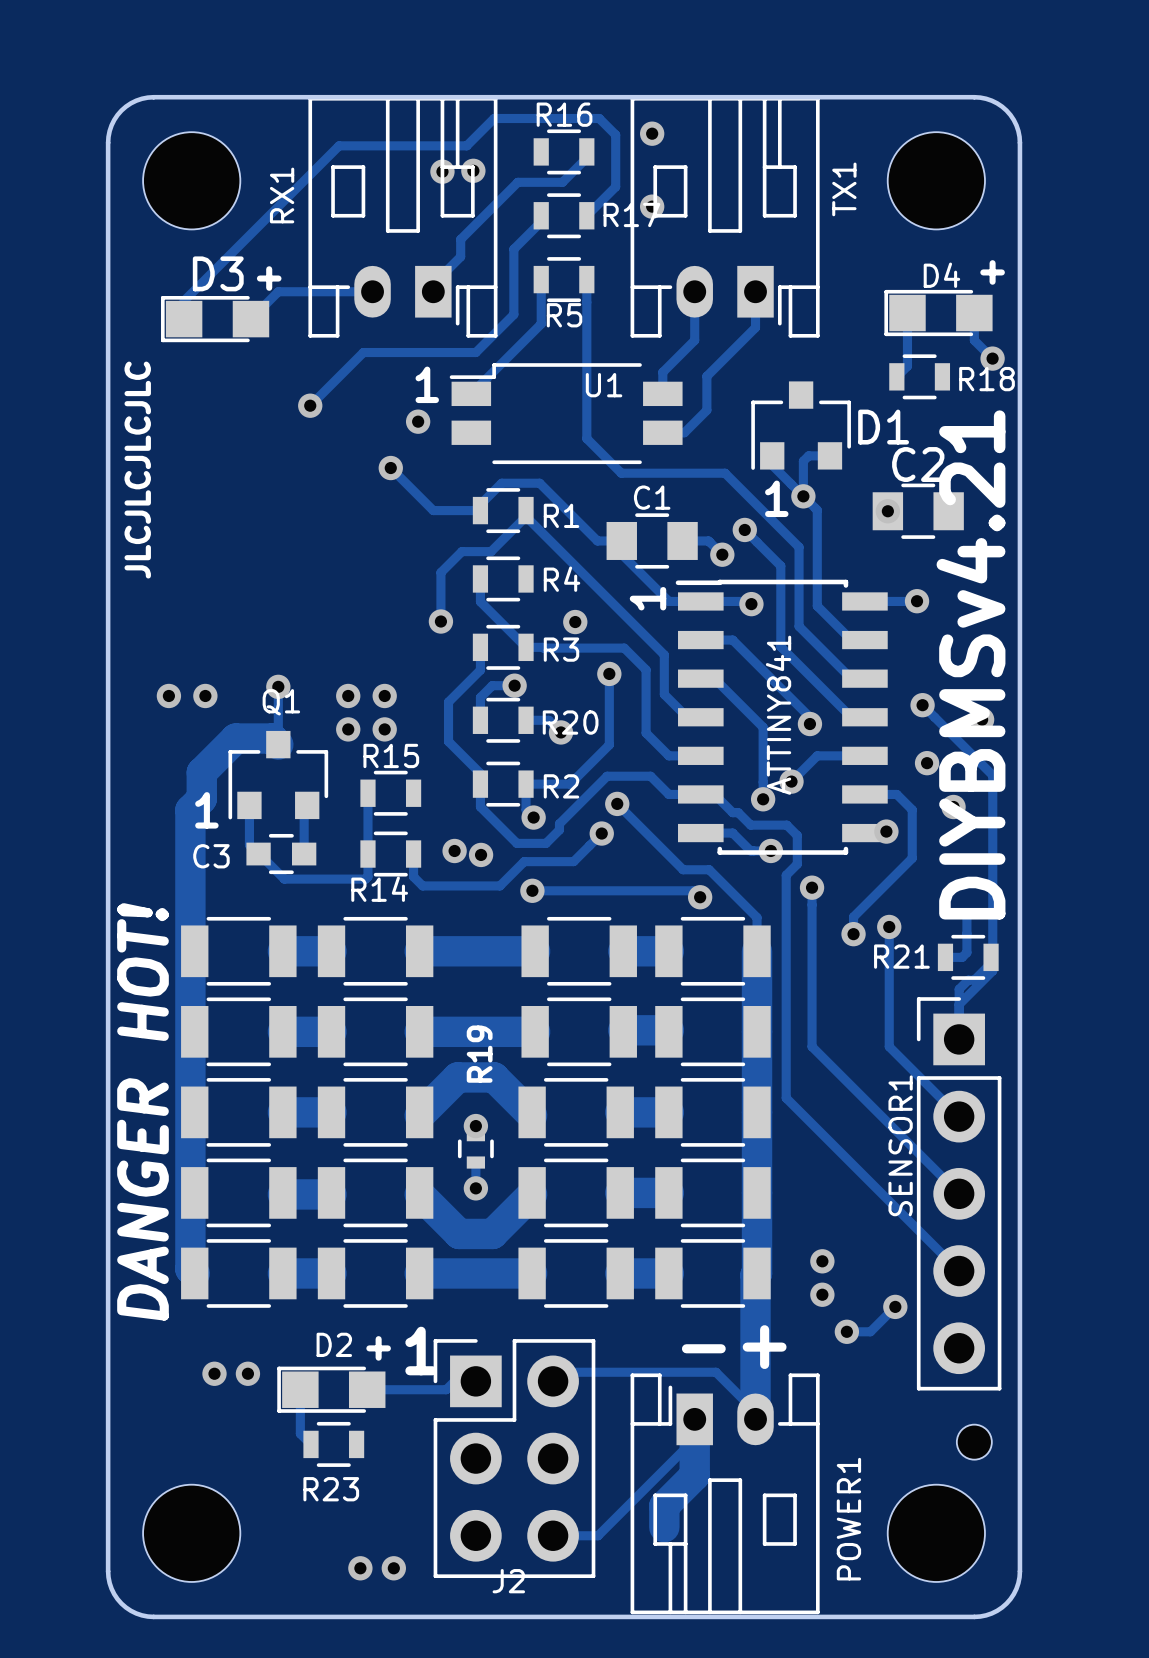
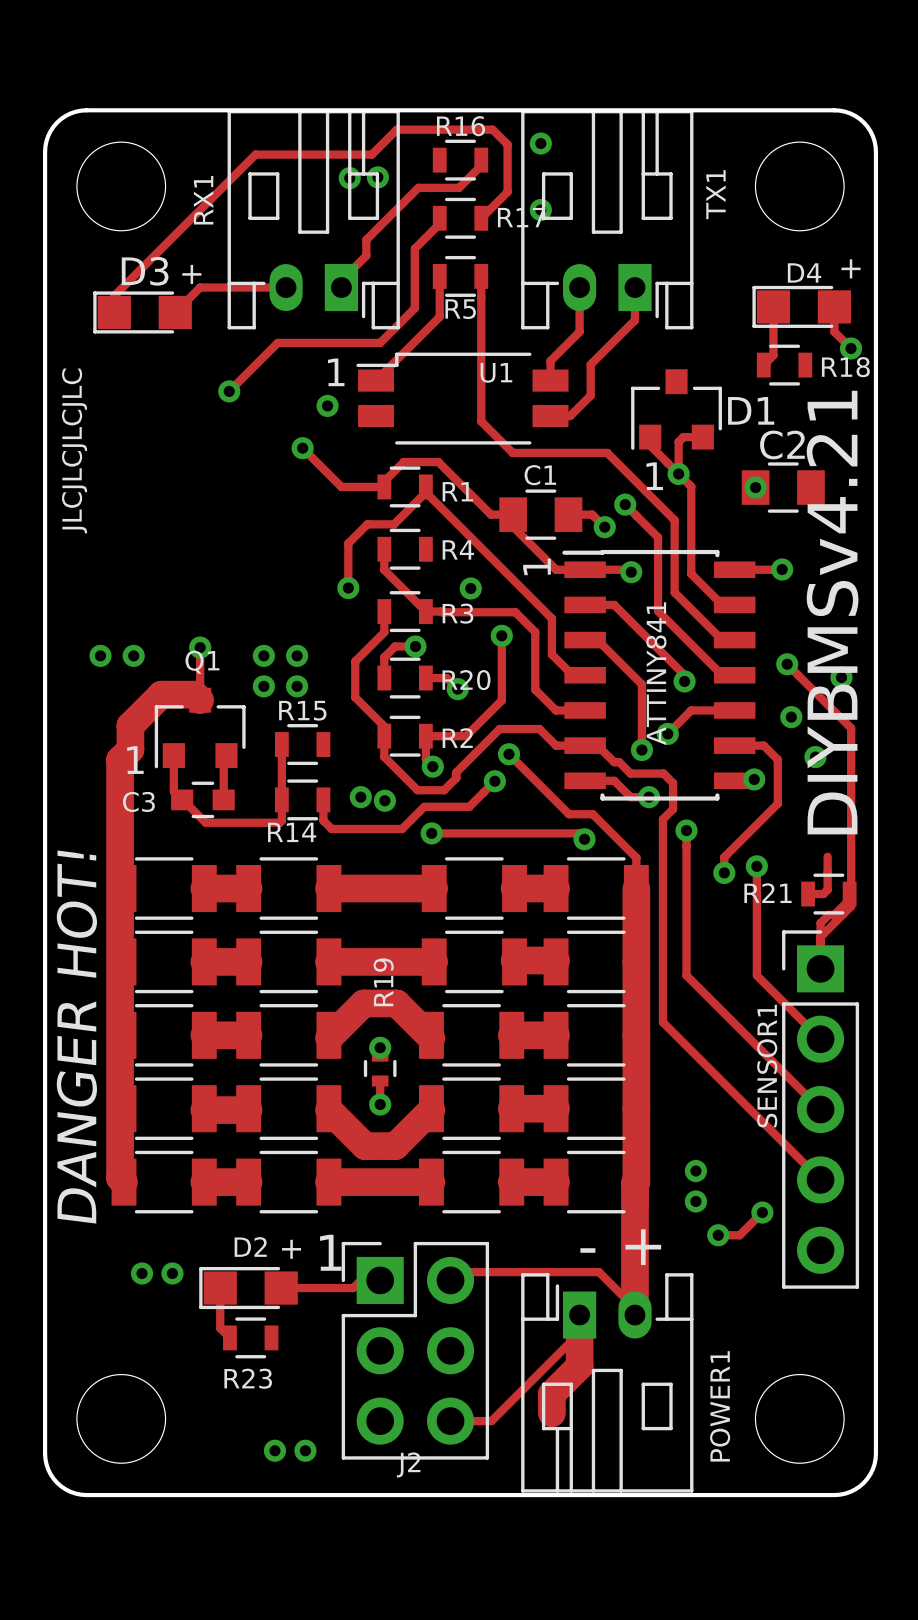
part: (974, 1442) -> none

